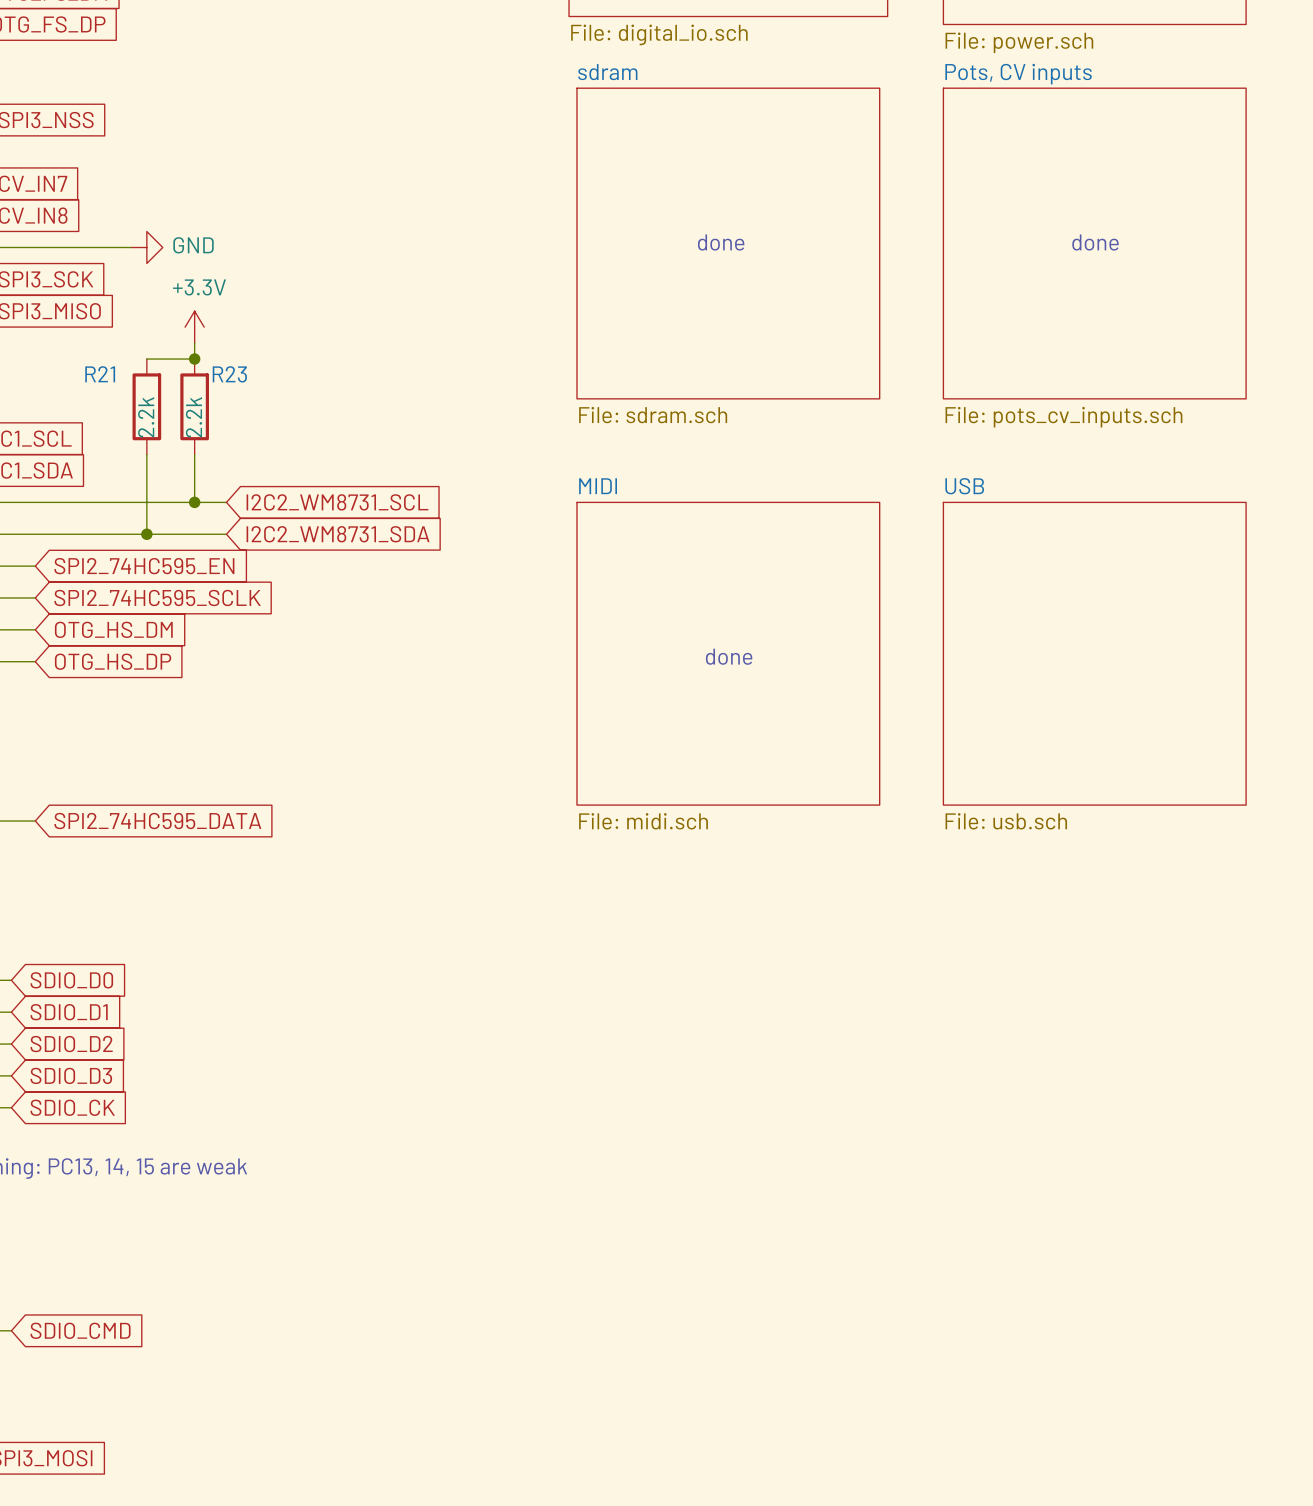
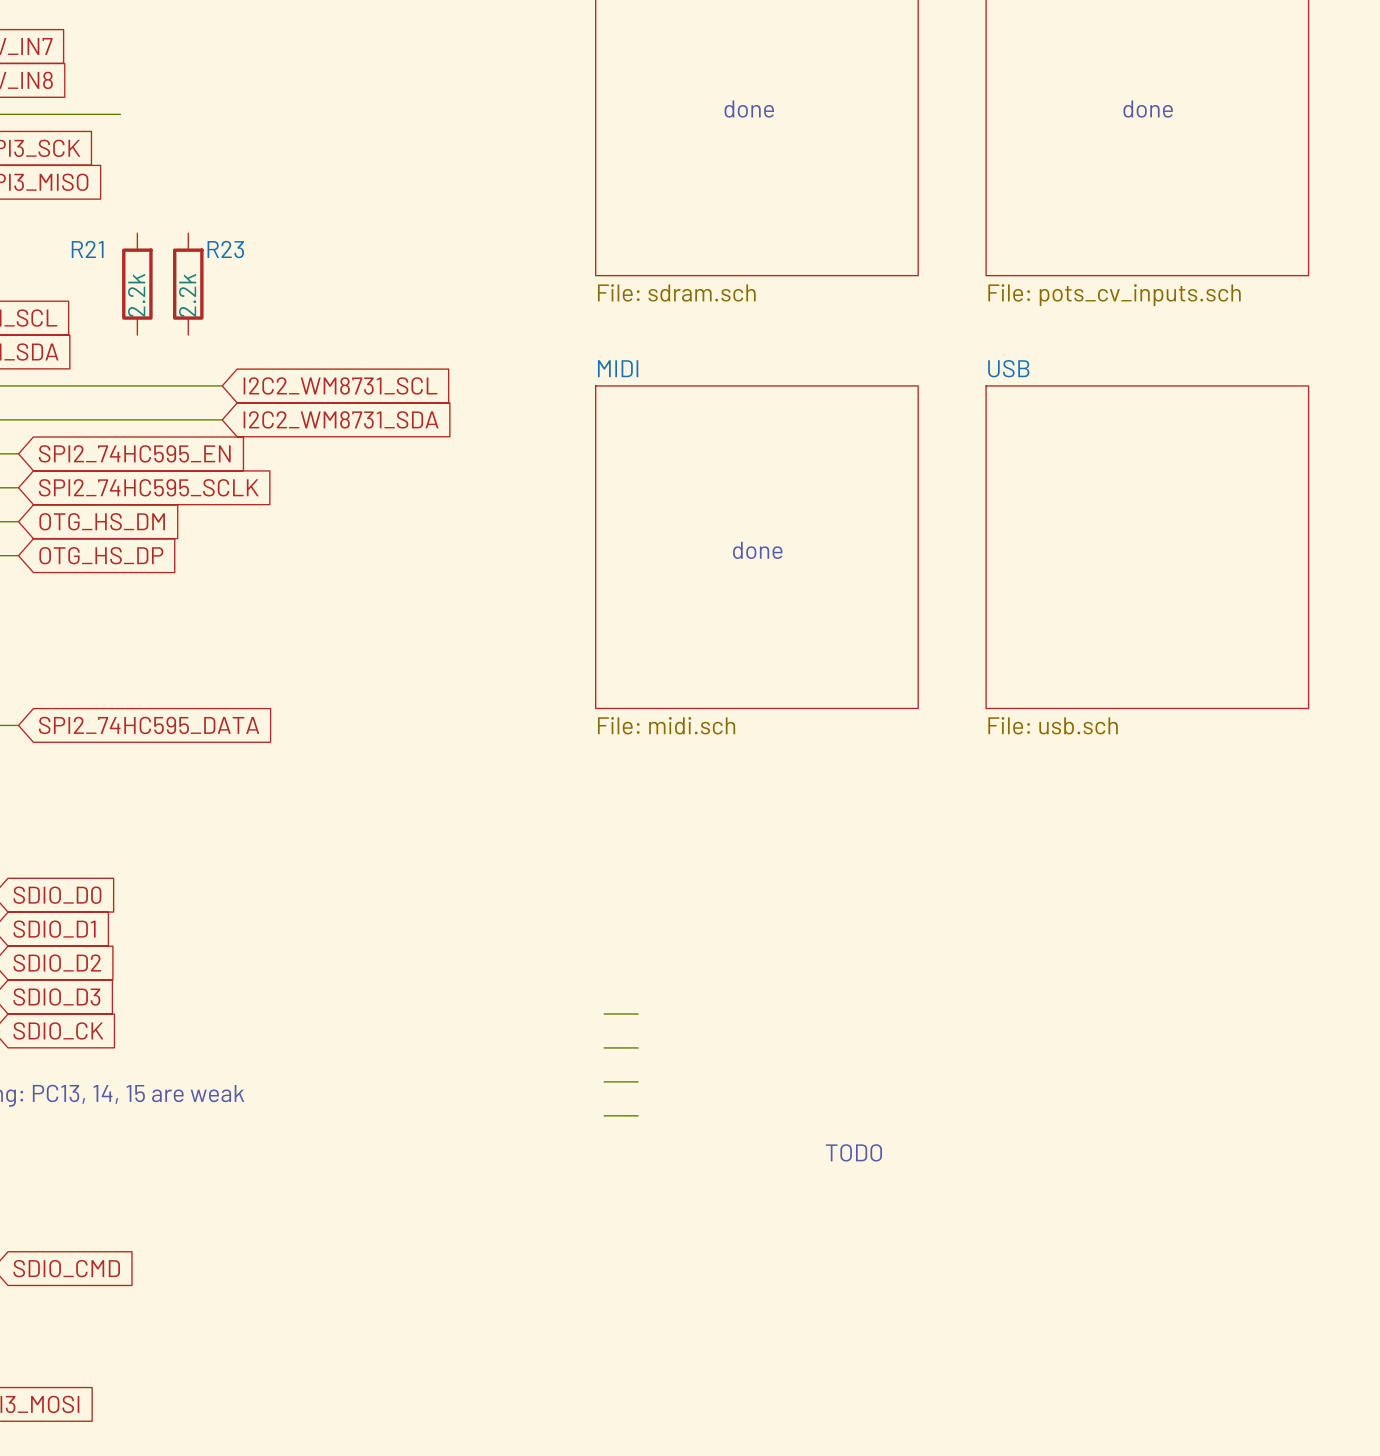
power symbol: GND (146, 247) -> none
power symbol: +3.3V (194, 327) -> none
wire: (194, 343) (194, 359) (146, 359) -> none
junction: (194, 359) -> none
wire: (146, 454) (146, 534) -> none
wire: (194, 454) (194, 502) -> none
junction: (194, 502) -> none
junction: (146, 534) -> none
wire: none -> (604, 1013) (638, 1013)
wire: none -> (604, 1047) (638, 1047)
wire: none -> (604, 1081) (638, 1081)
wire: none -> (604, 1115) (638, 1115)
text: none -> TODO (853, 1152)

